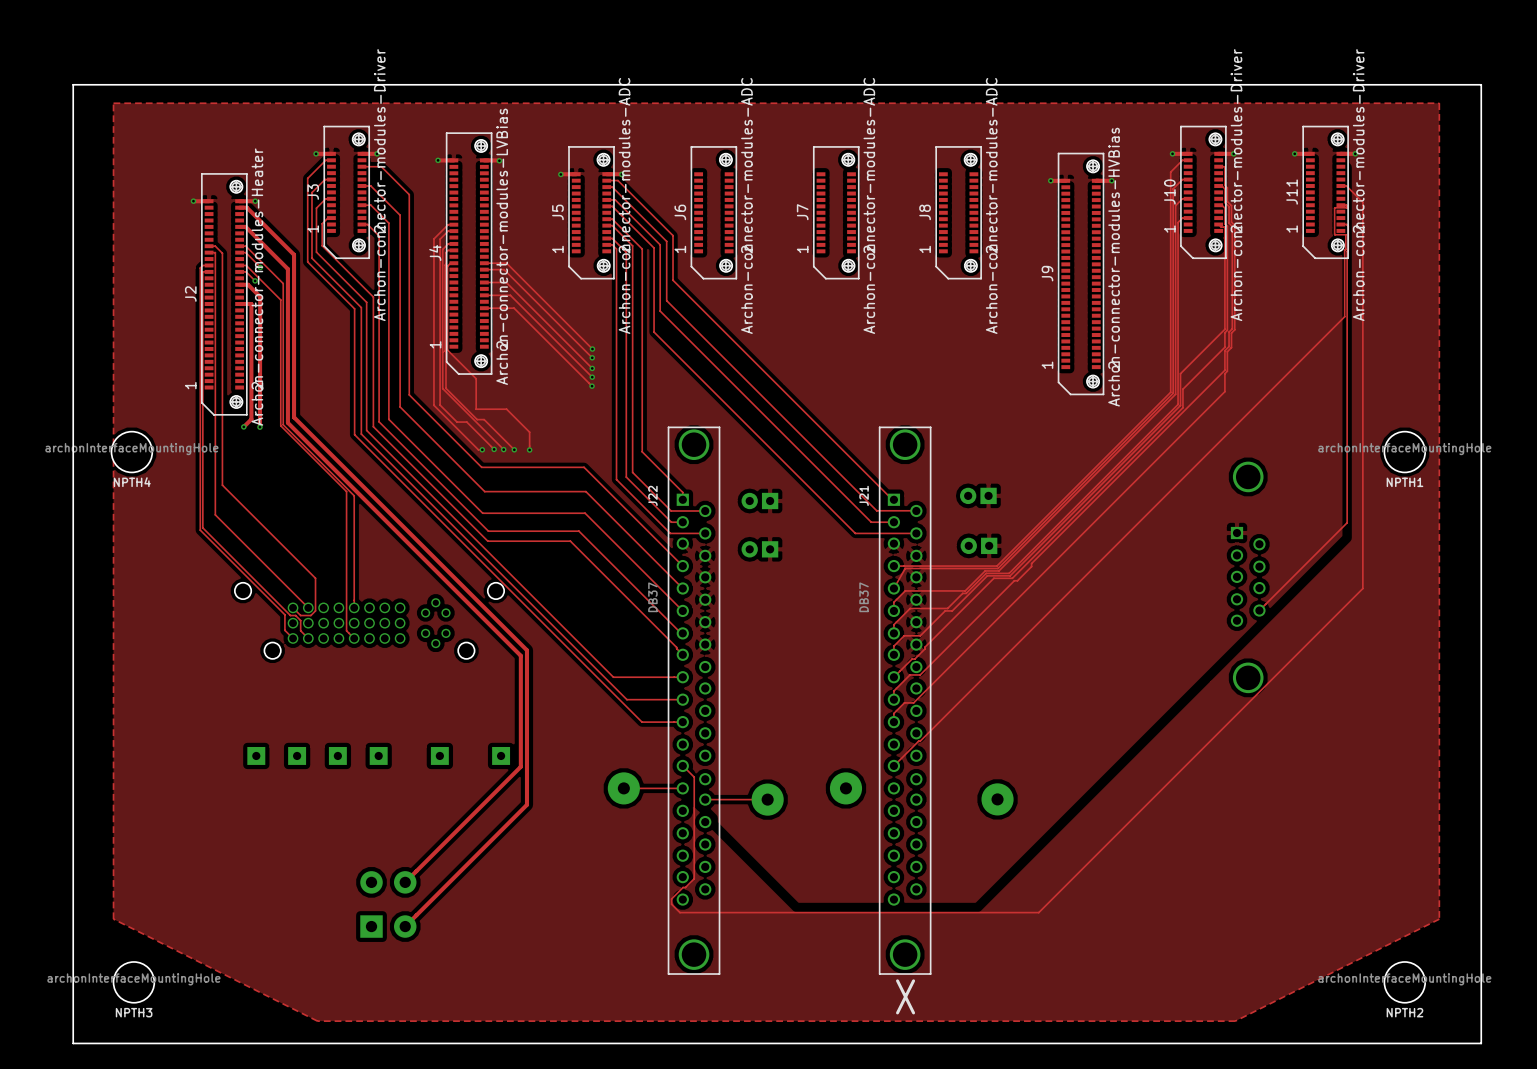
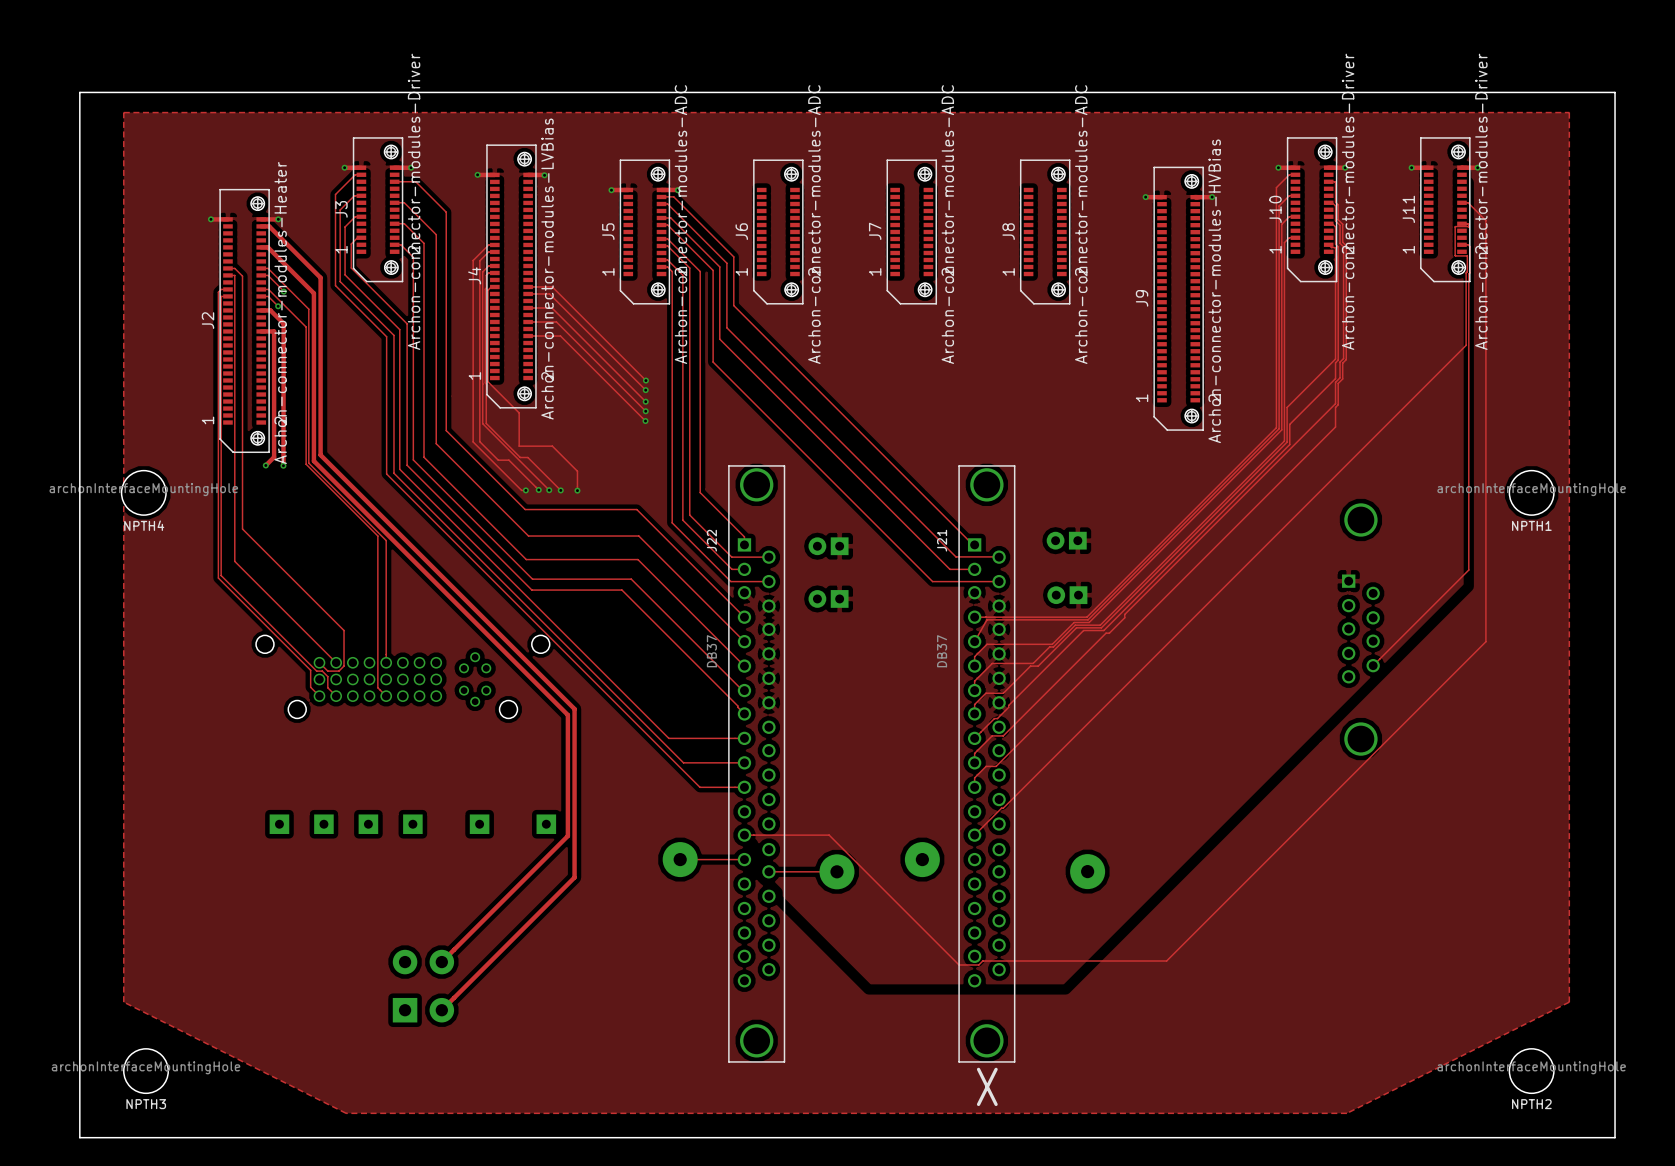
track: (683, 765) (694, 777) (694, 878) (671, 898) (671, 904) (679, 912) (1038, 912) (1070, 881) -> (744, 835) (829, 835) (959, 965) (978, 965) (982, 961) (1166, 961)

